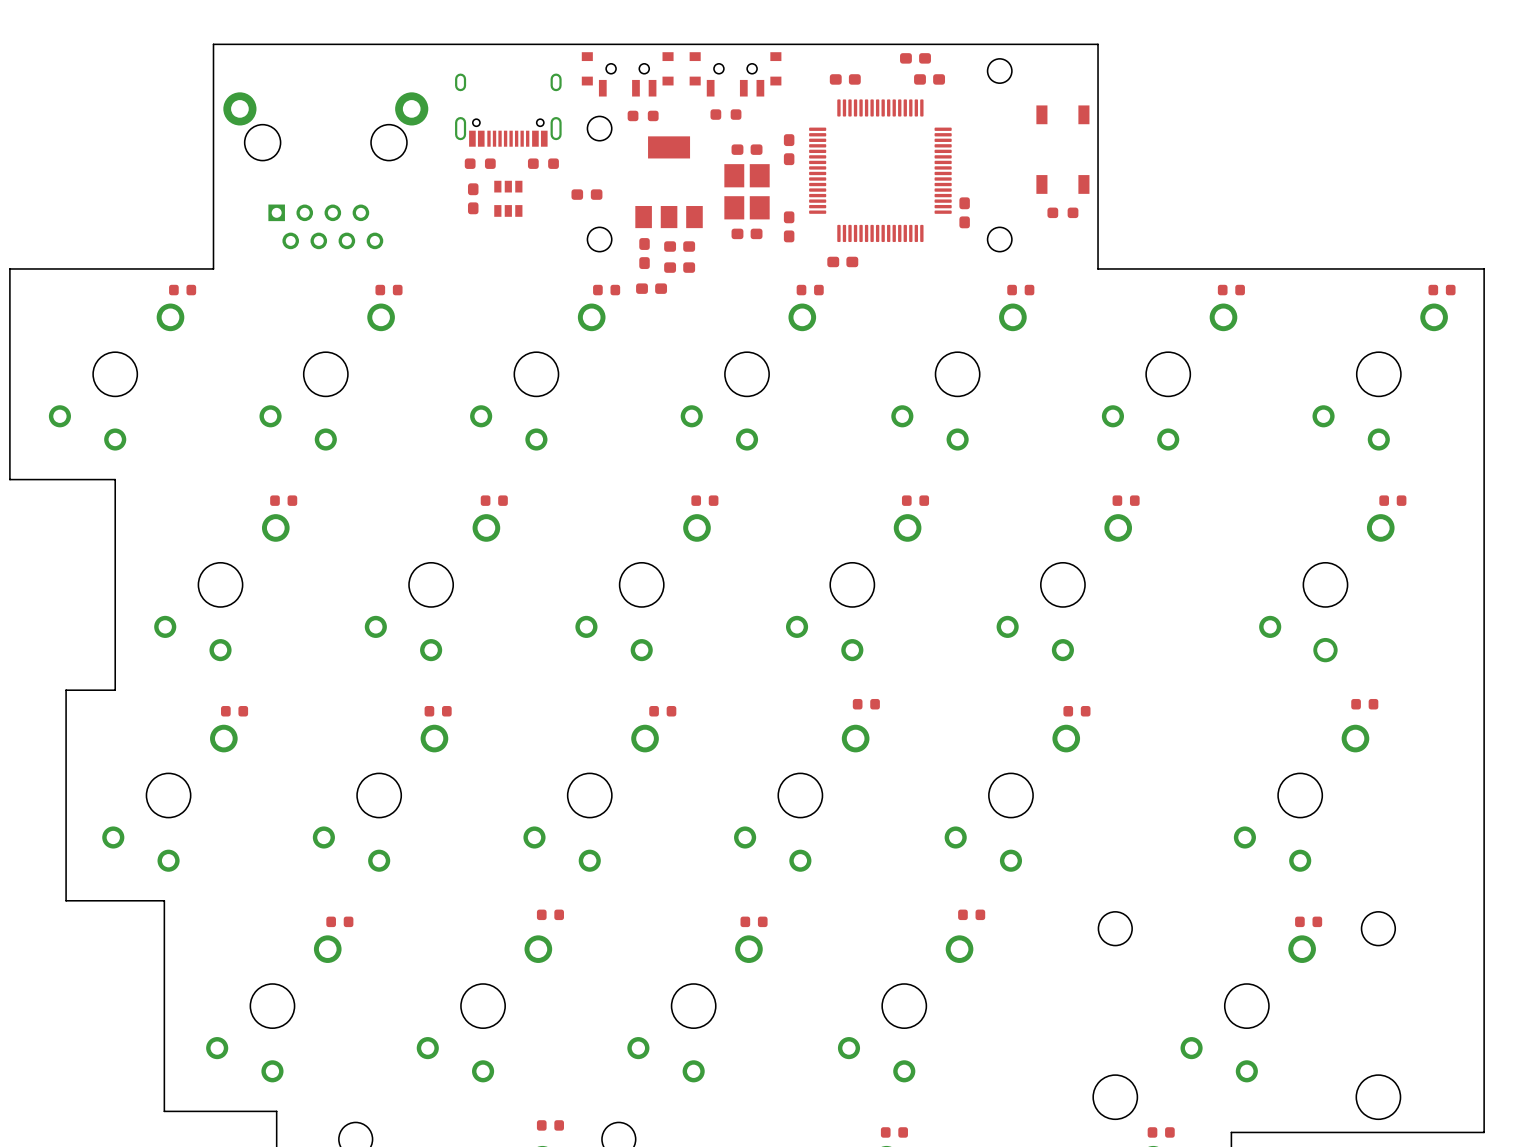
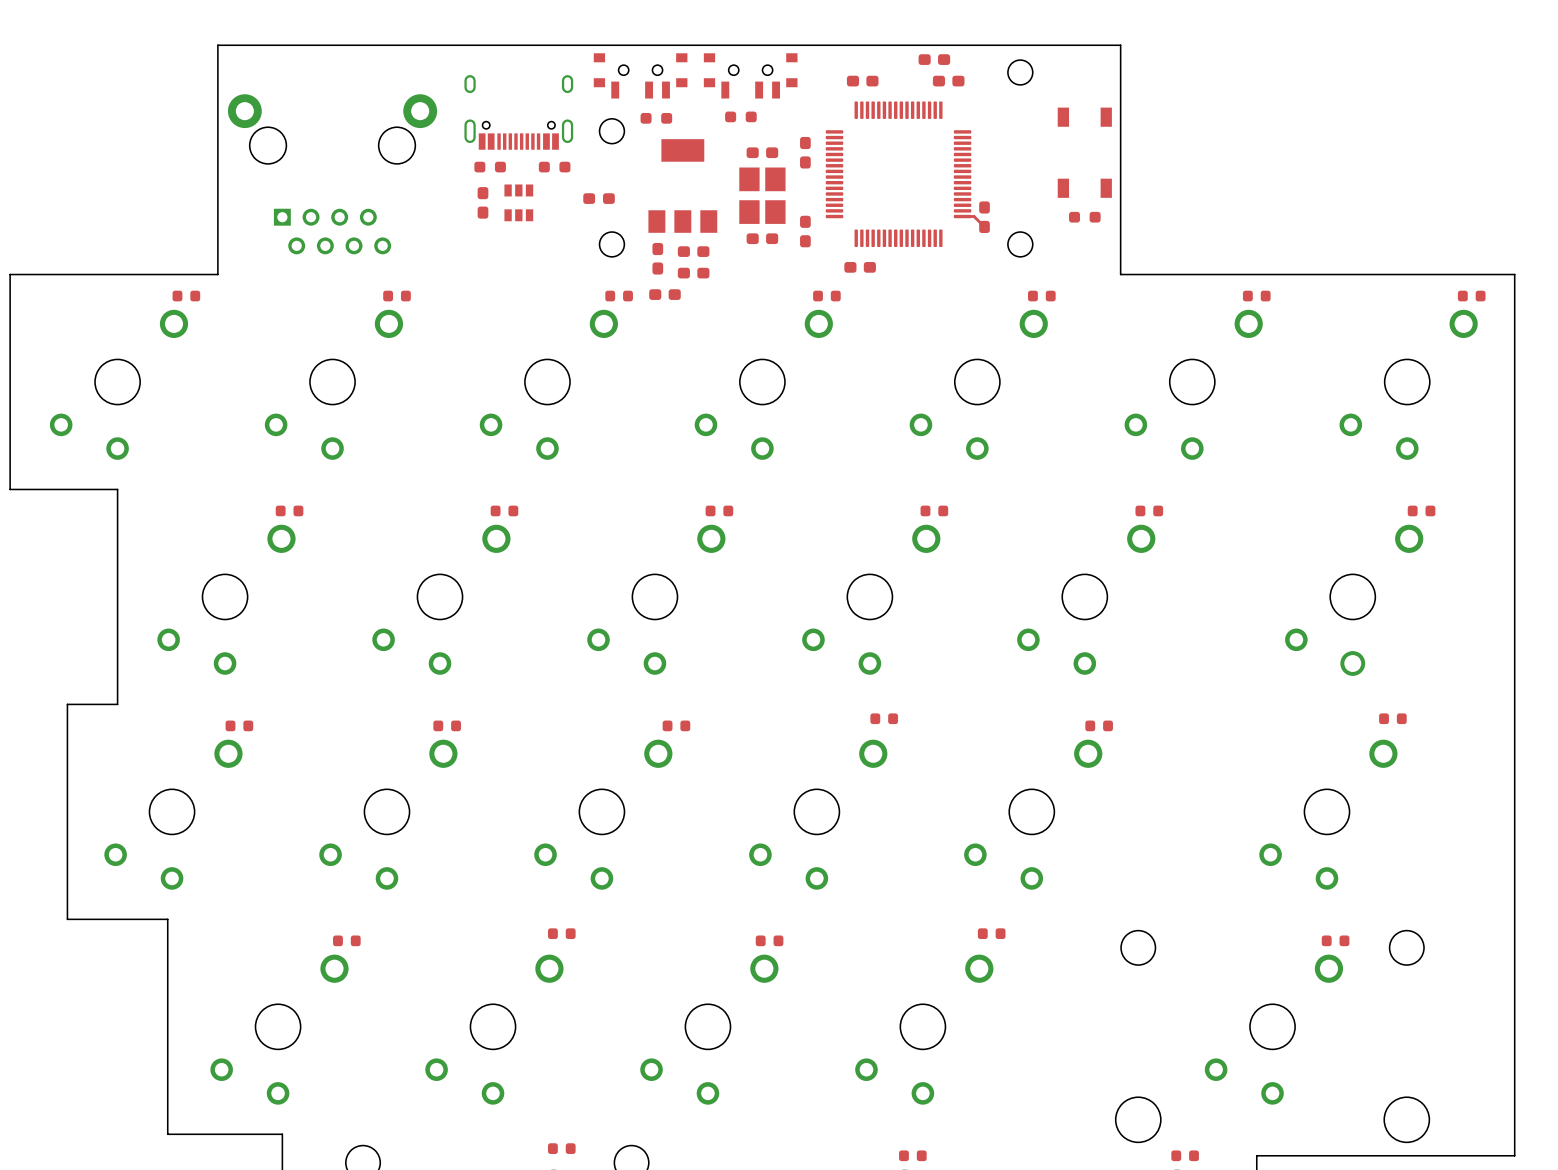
top track: none -> (962, 216) (974, 216) (984, 226)

